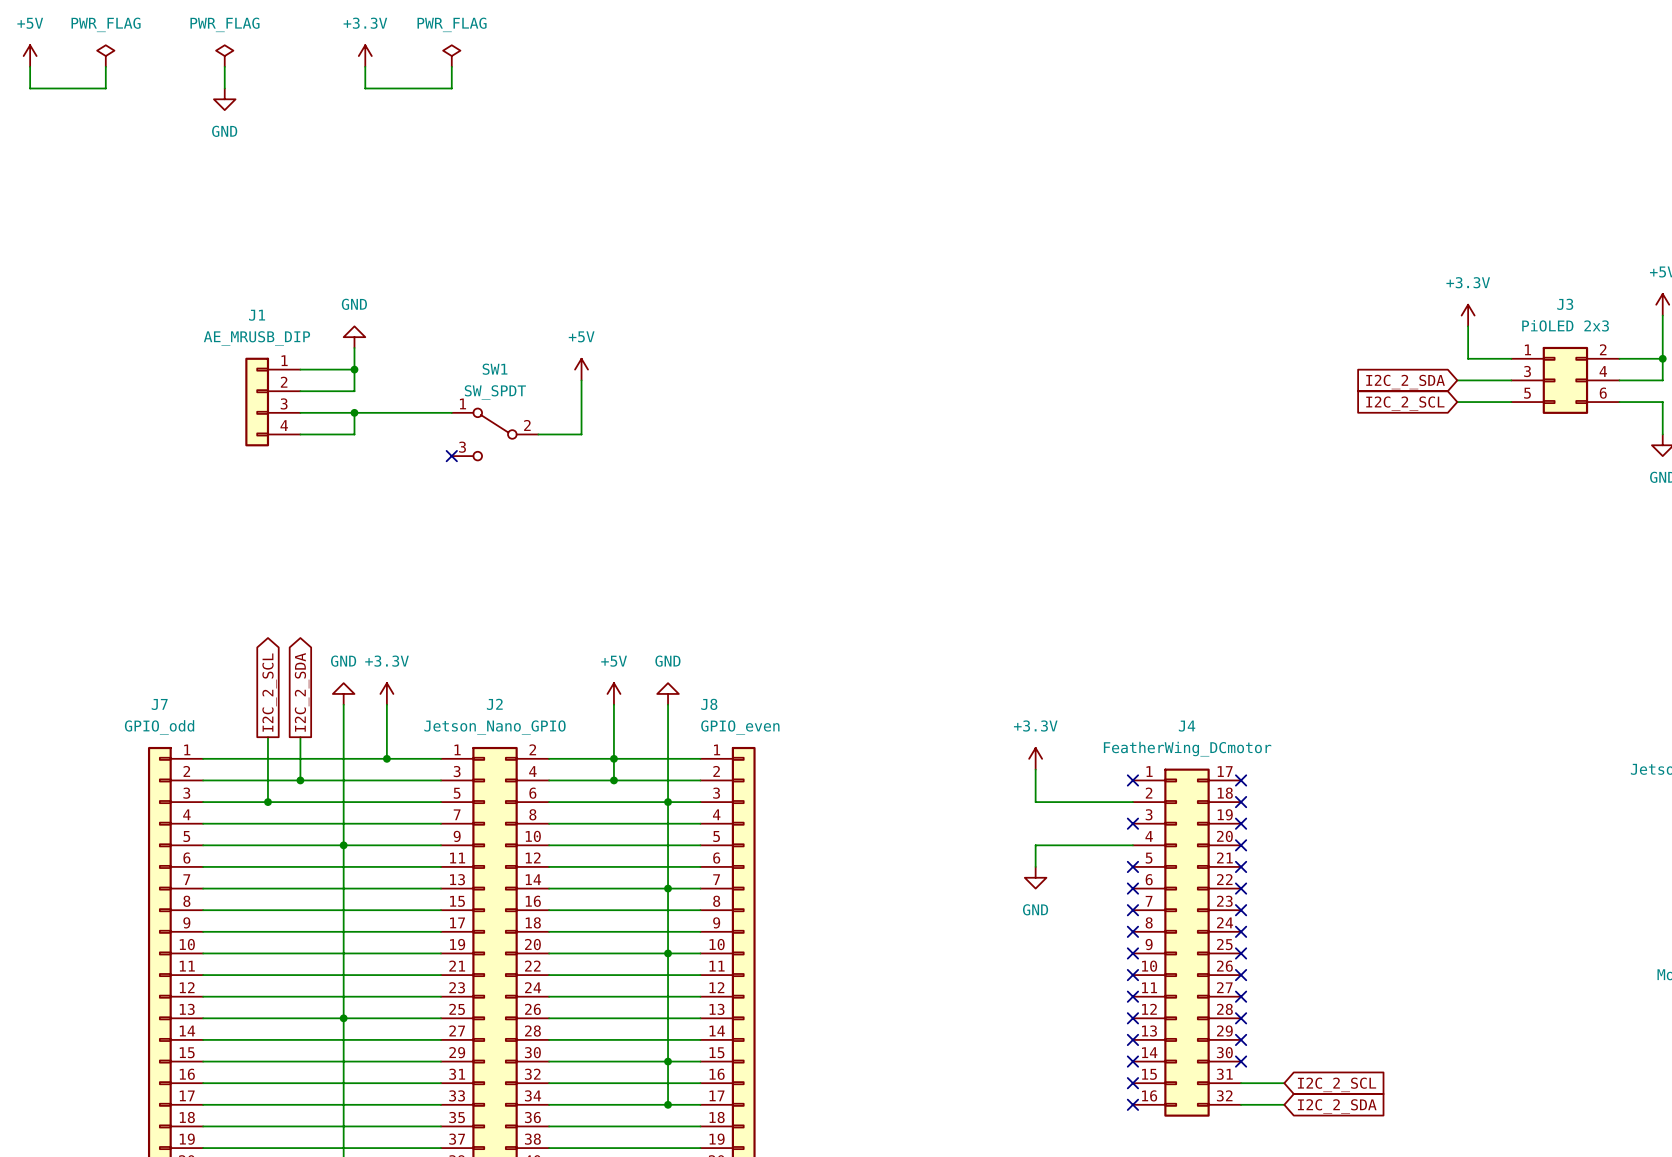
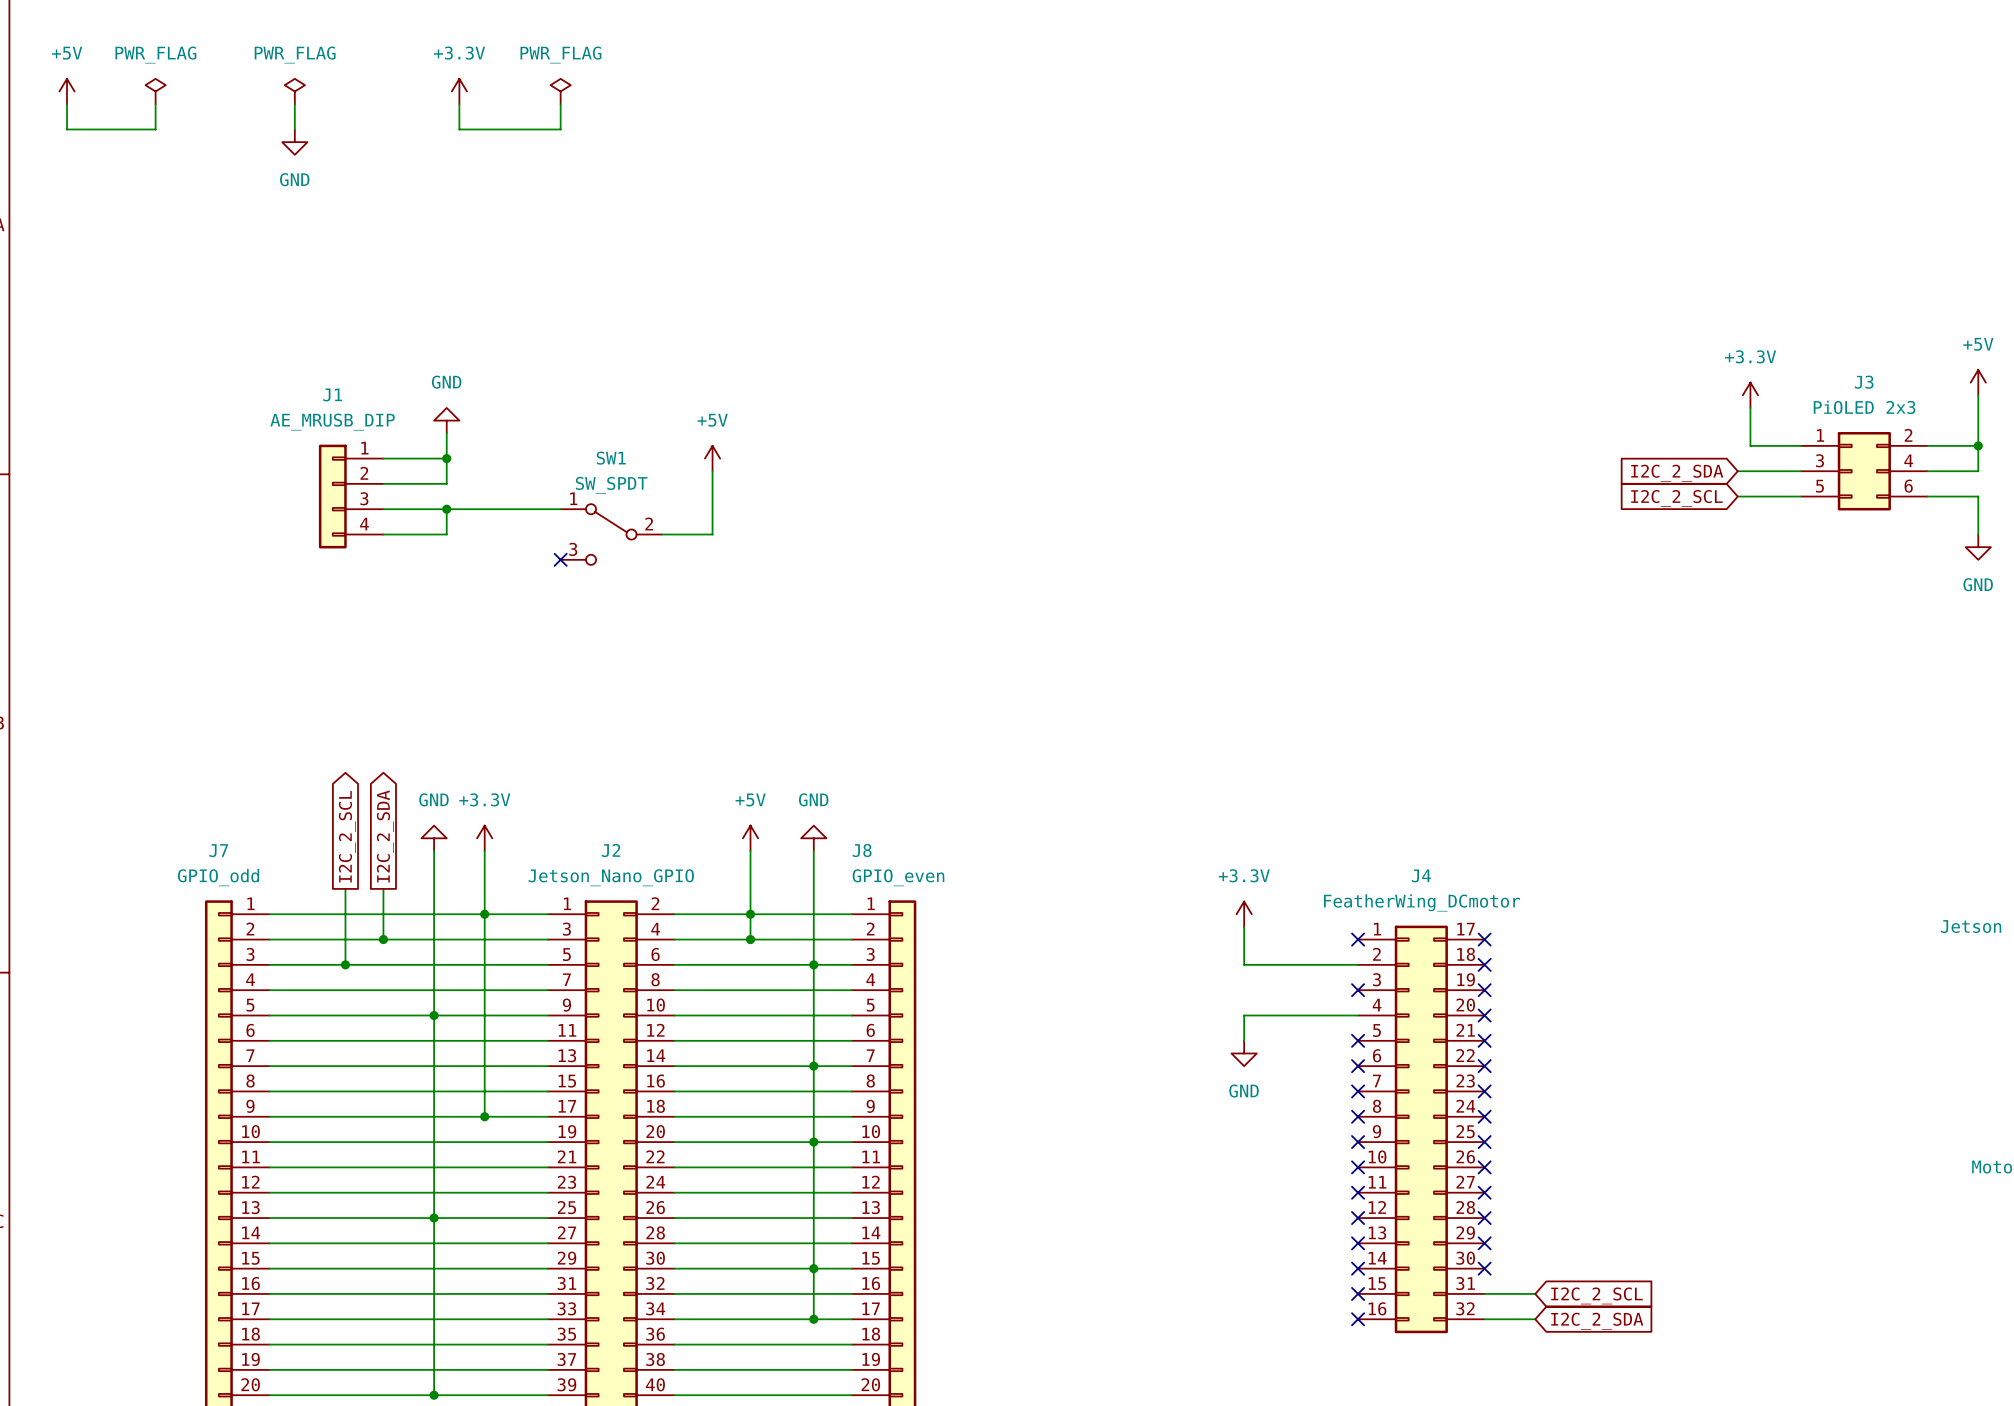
wire: none -> (484, 914) (484, 1116)
junction: none -> (484, 1116)

